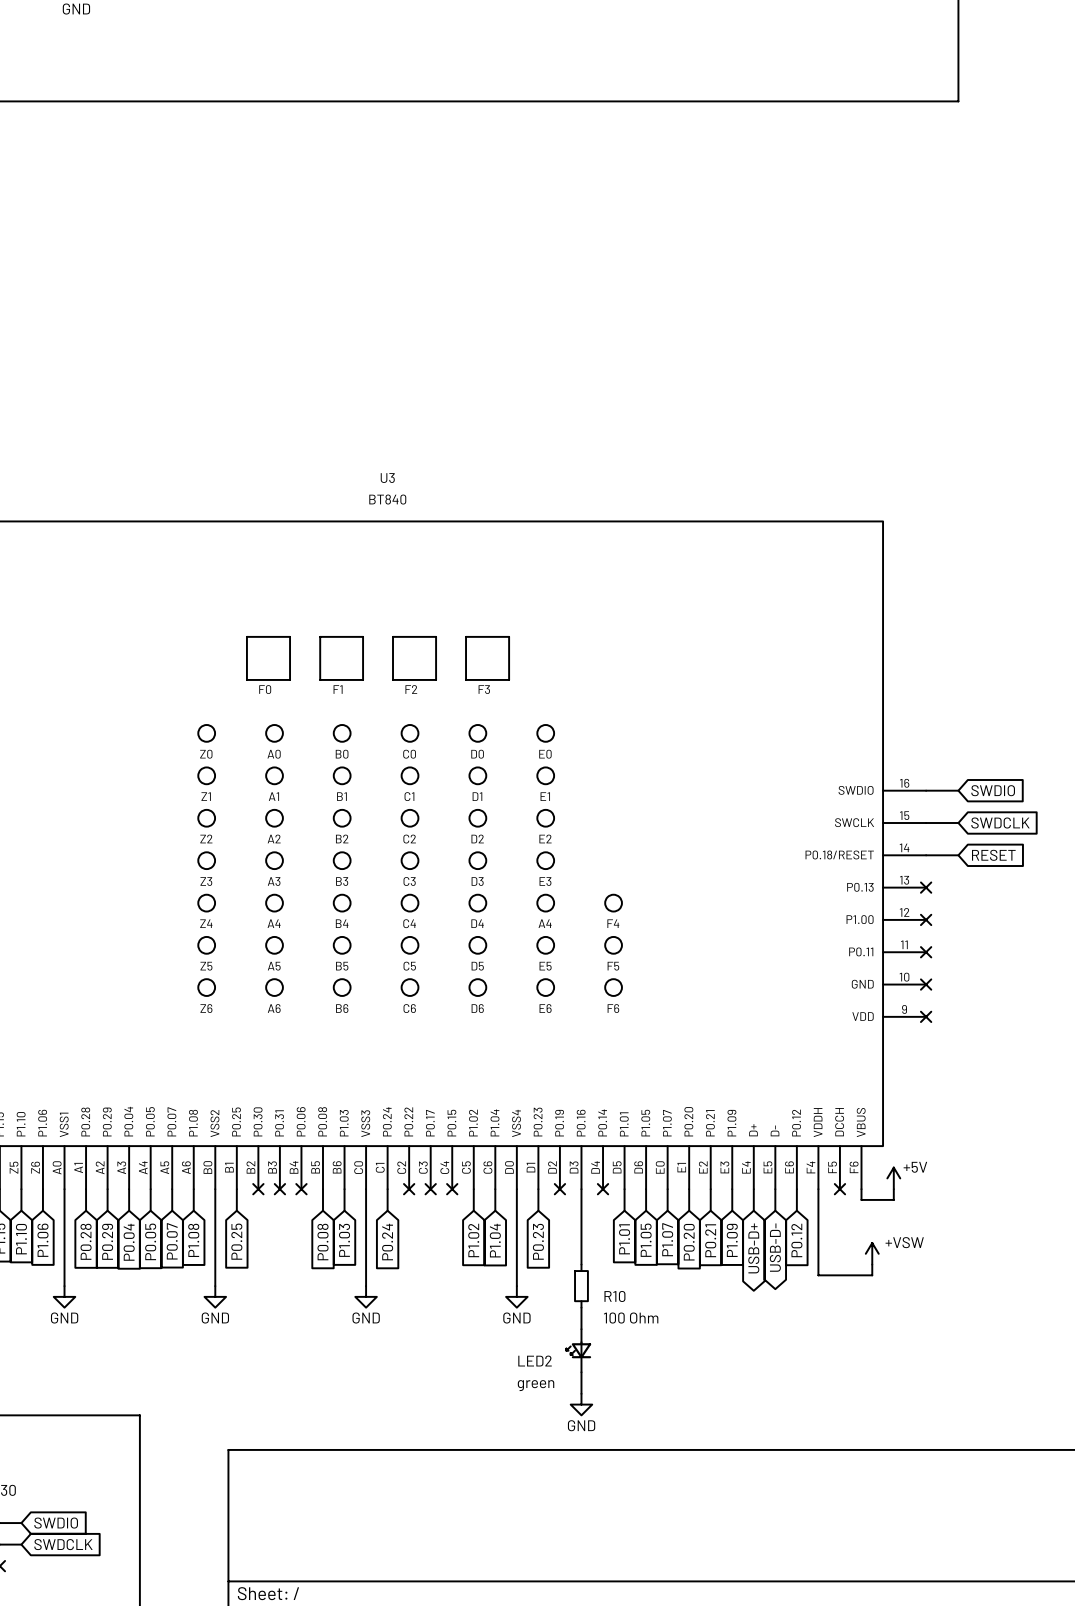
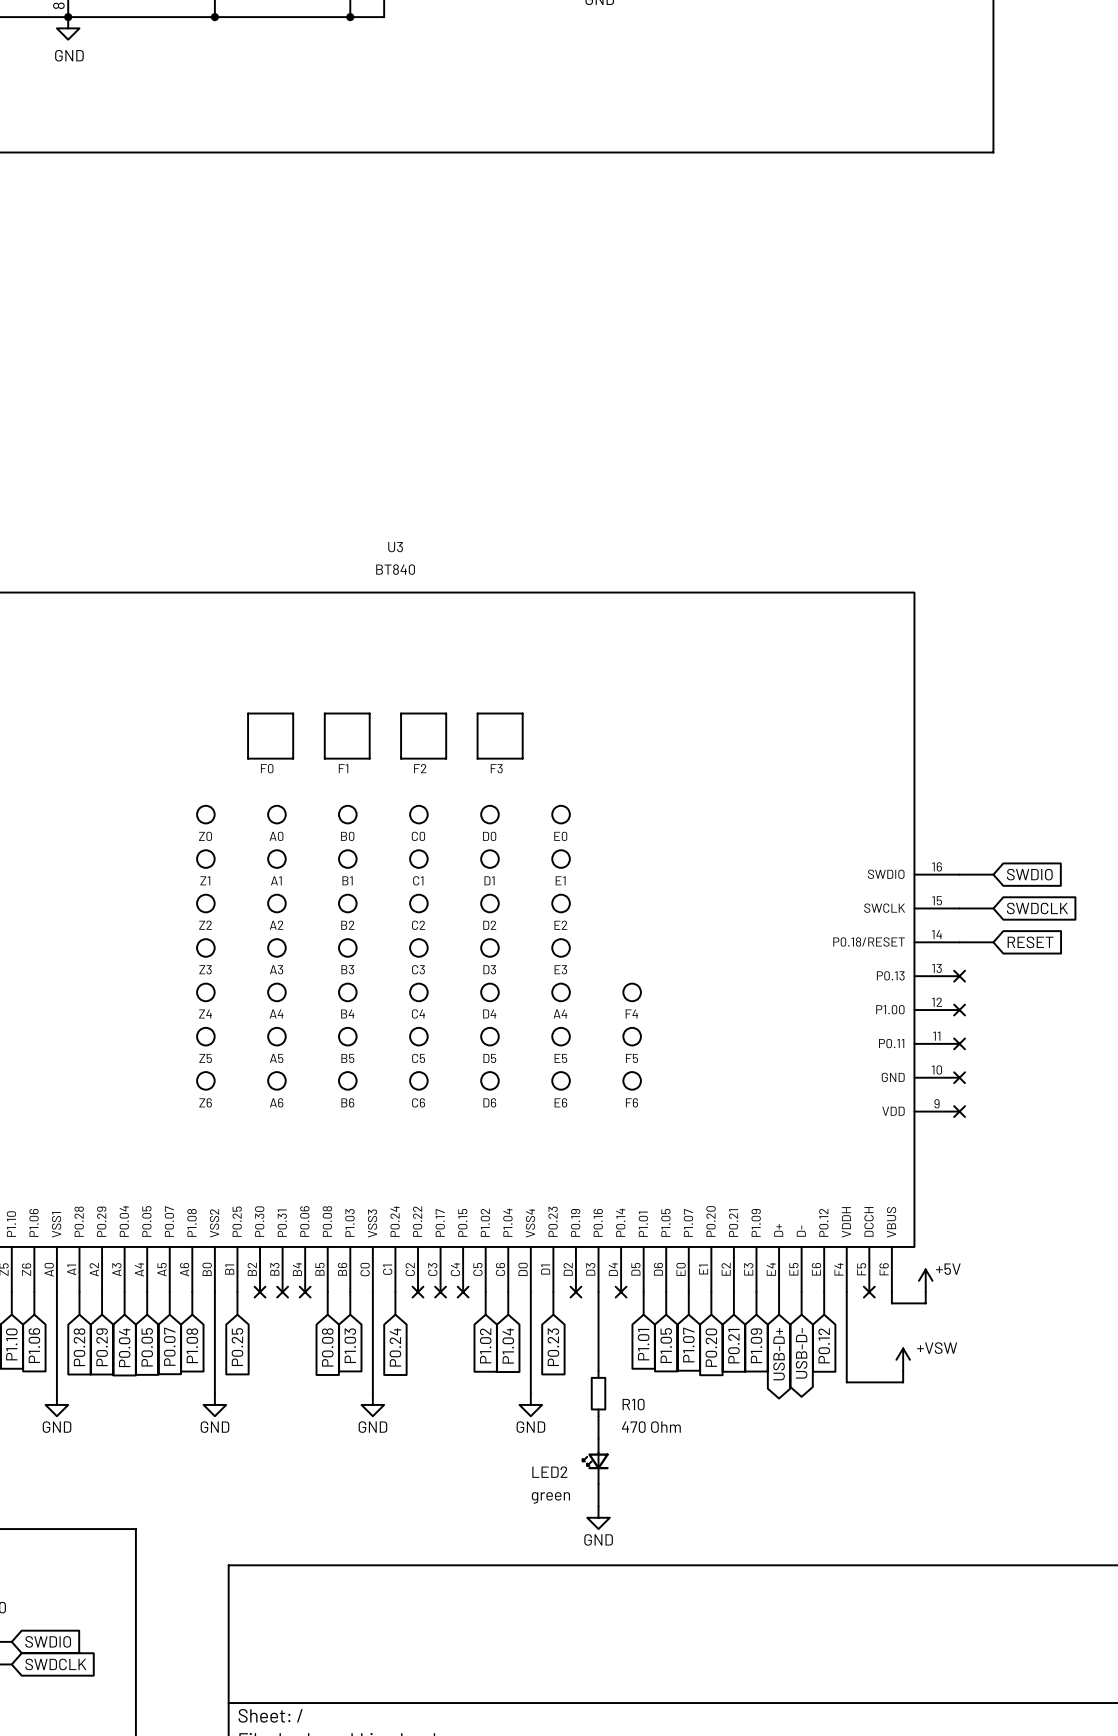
R10 value: 100 Ohm (631, 1318) -> 470 Ohm (651, 1427)

